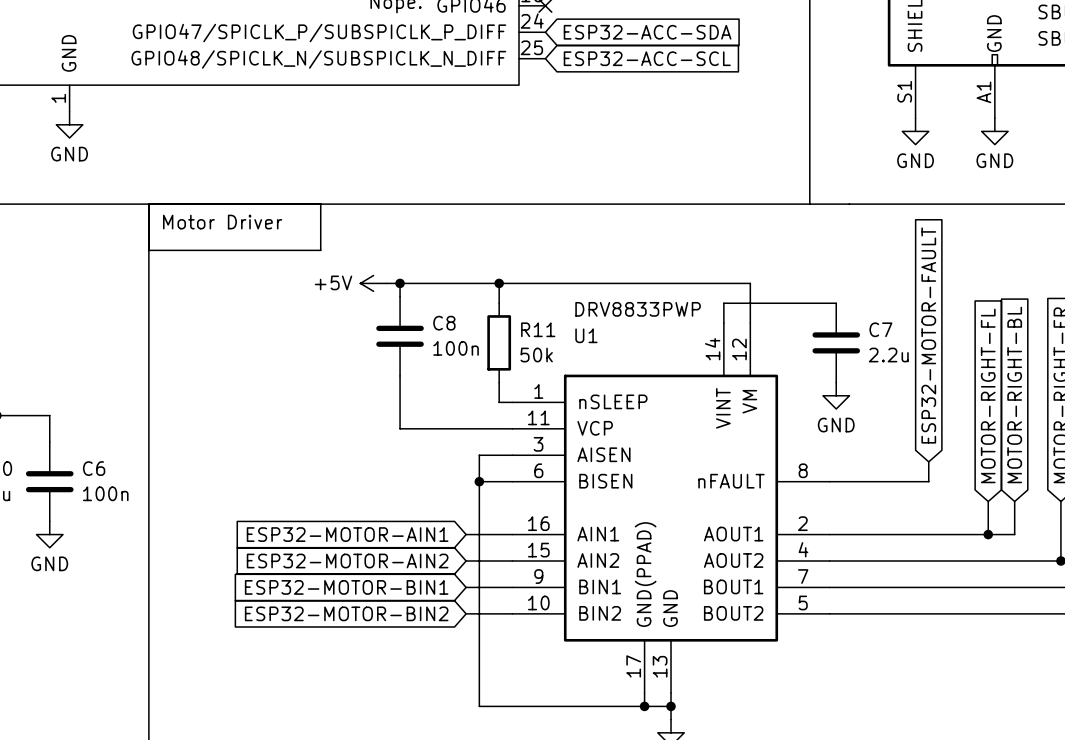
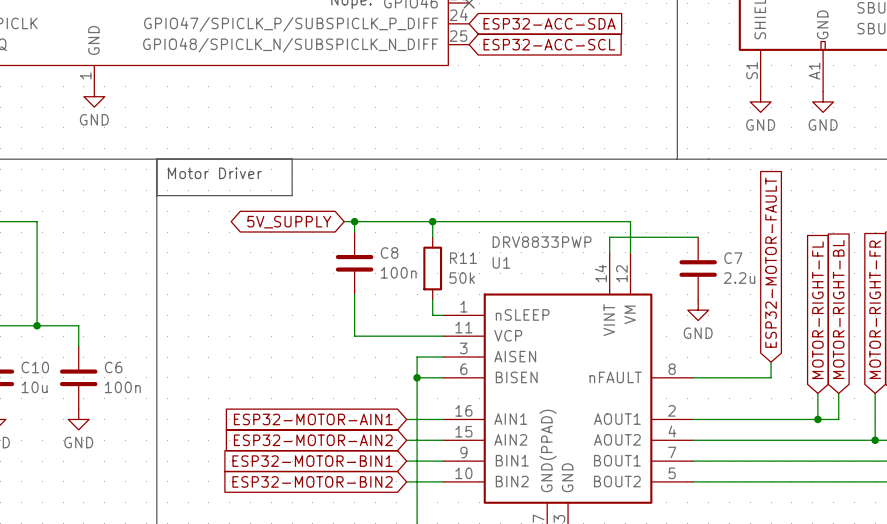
power symbol: +5V (373, 283) -> none
global label: none -> 5V_SUPPLY (289, 222)

